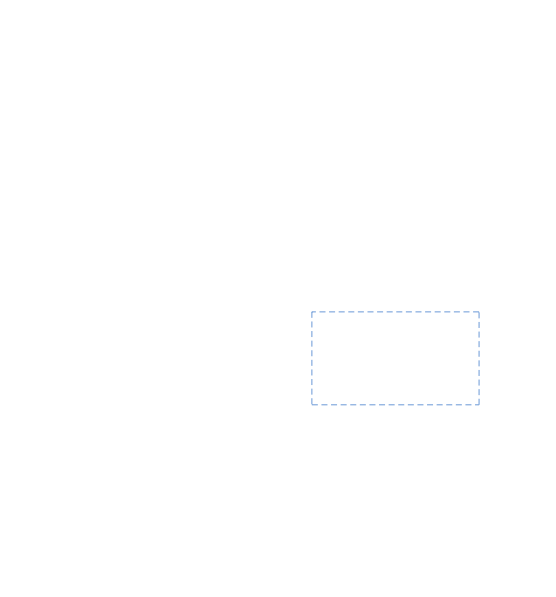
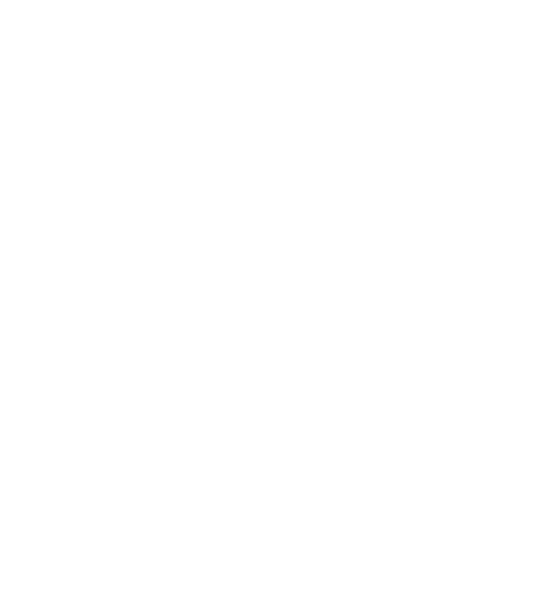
bottom zone outline: (479, 311) (311, 311) (311, 404) (479, 404) (479, 311) -> none

